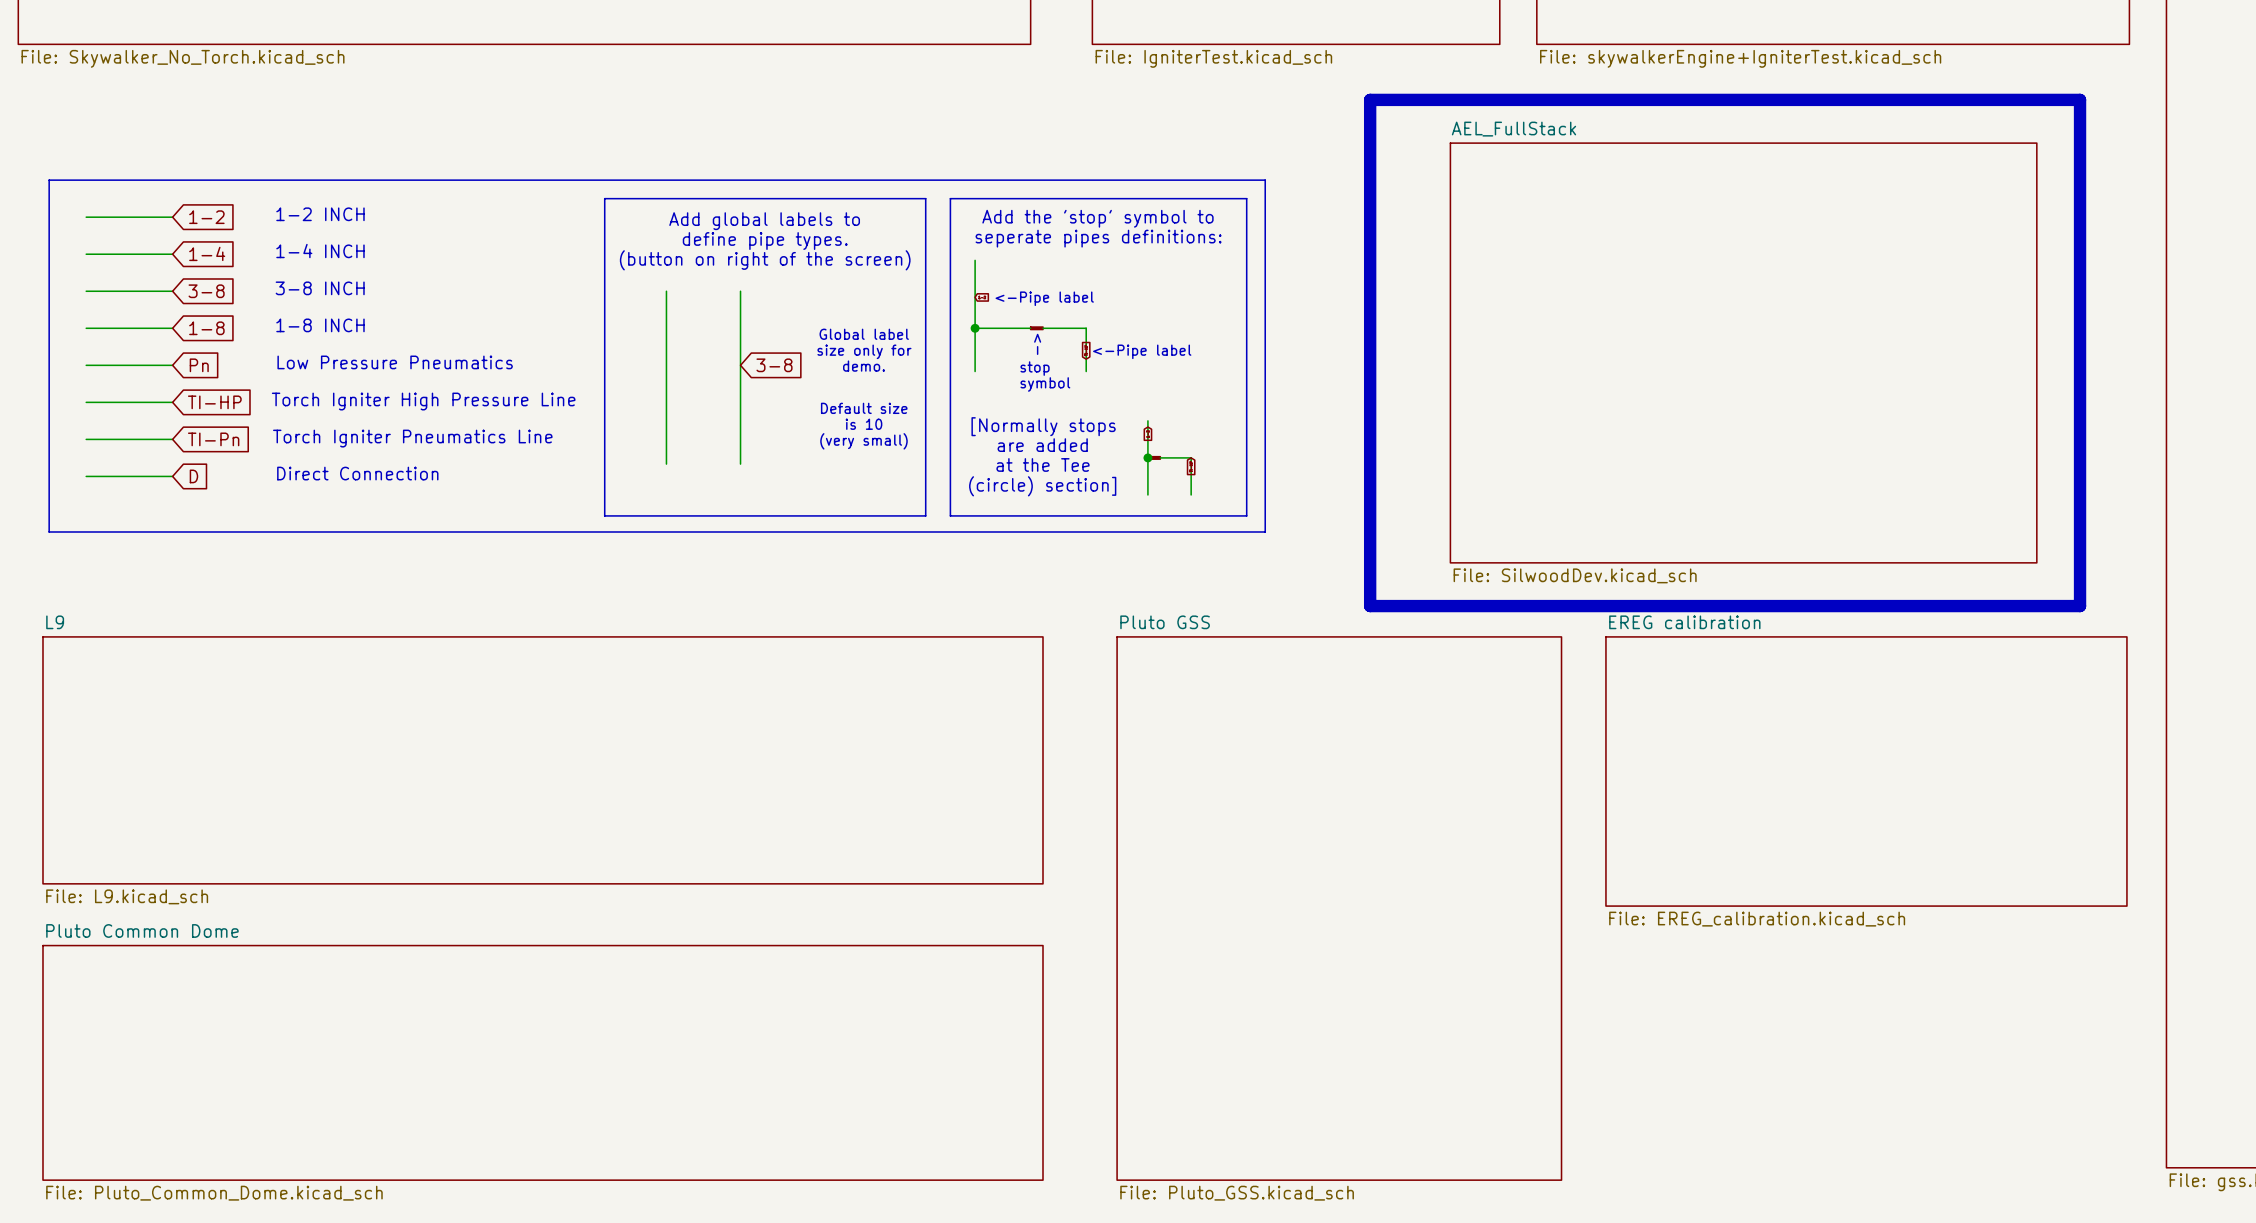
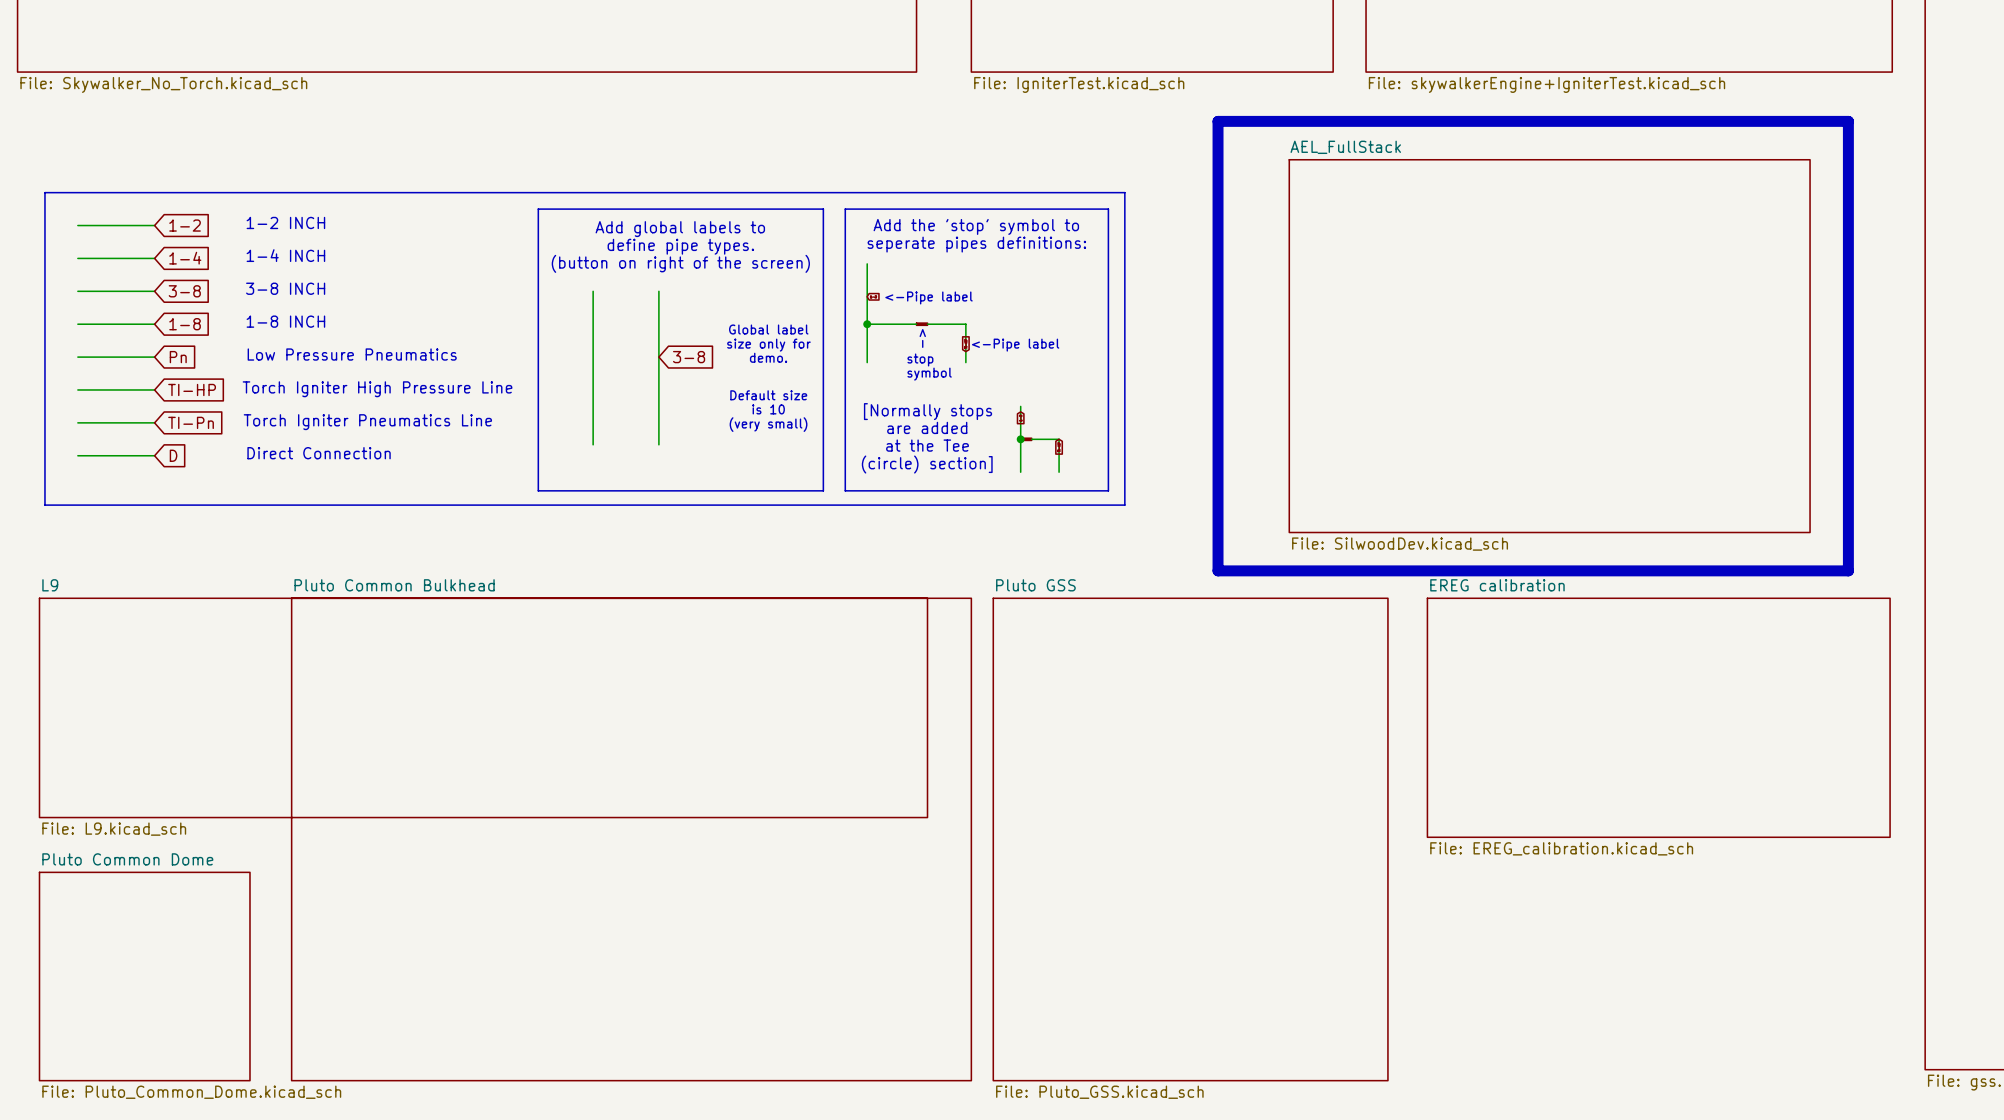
sheet Pluto Common Bulkhead: none -> (631, 839)
sheet Pluto Common Dome: none -> File: Pluto_Common_Dome.kicad_sch (144, 976)
sheet Pluto Common Dome: File: Pluto_Common_Dome.kicad_sch (542, 1062) -> none

